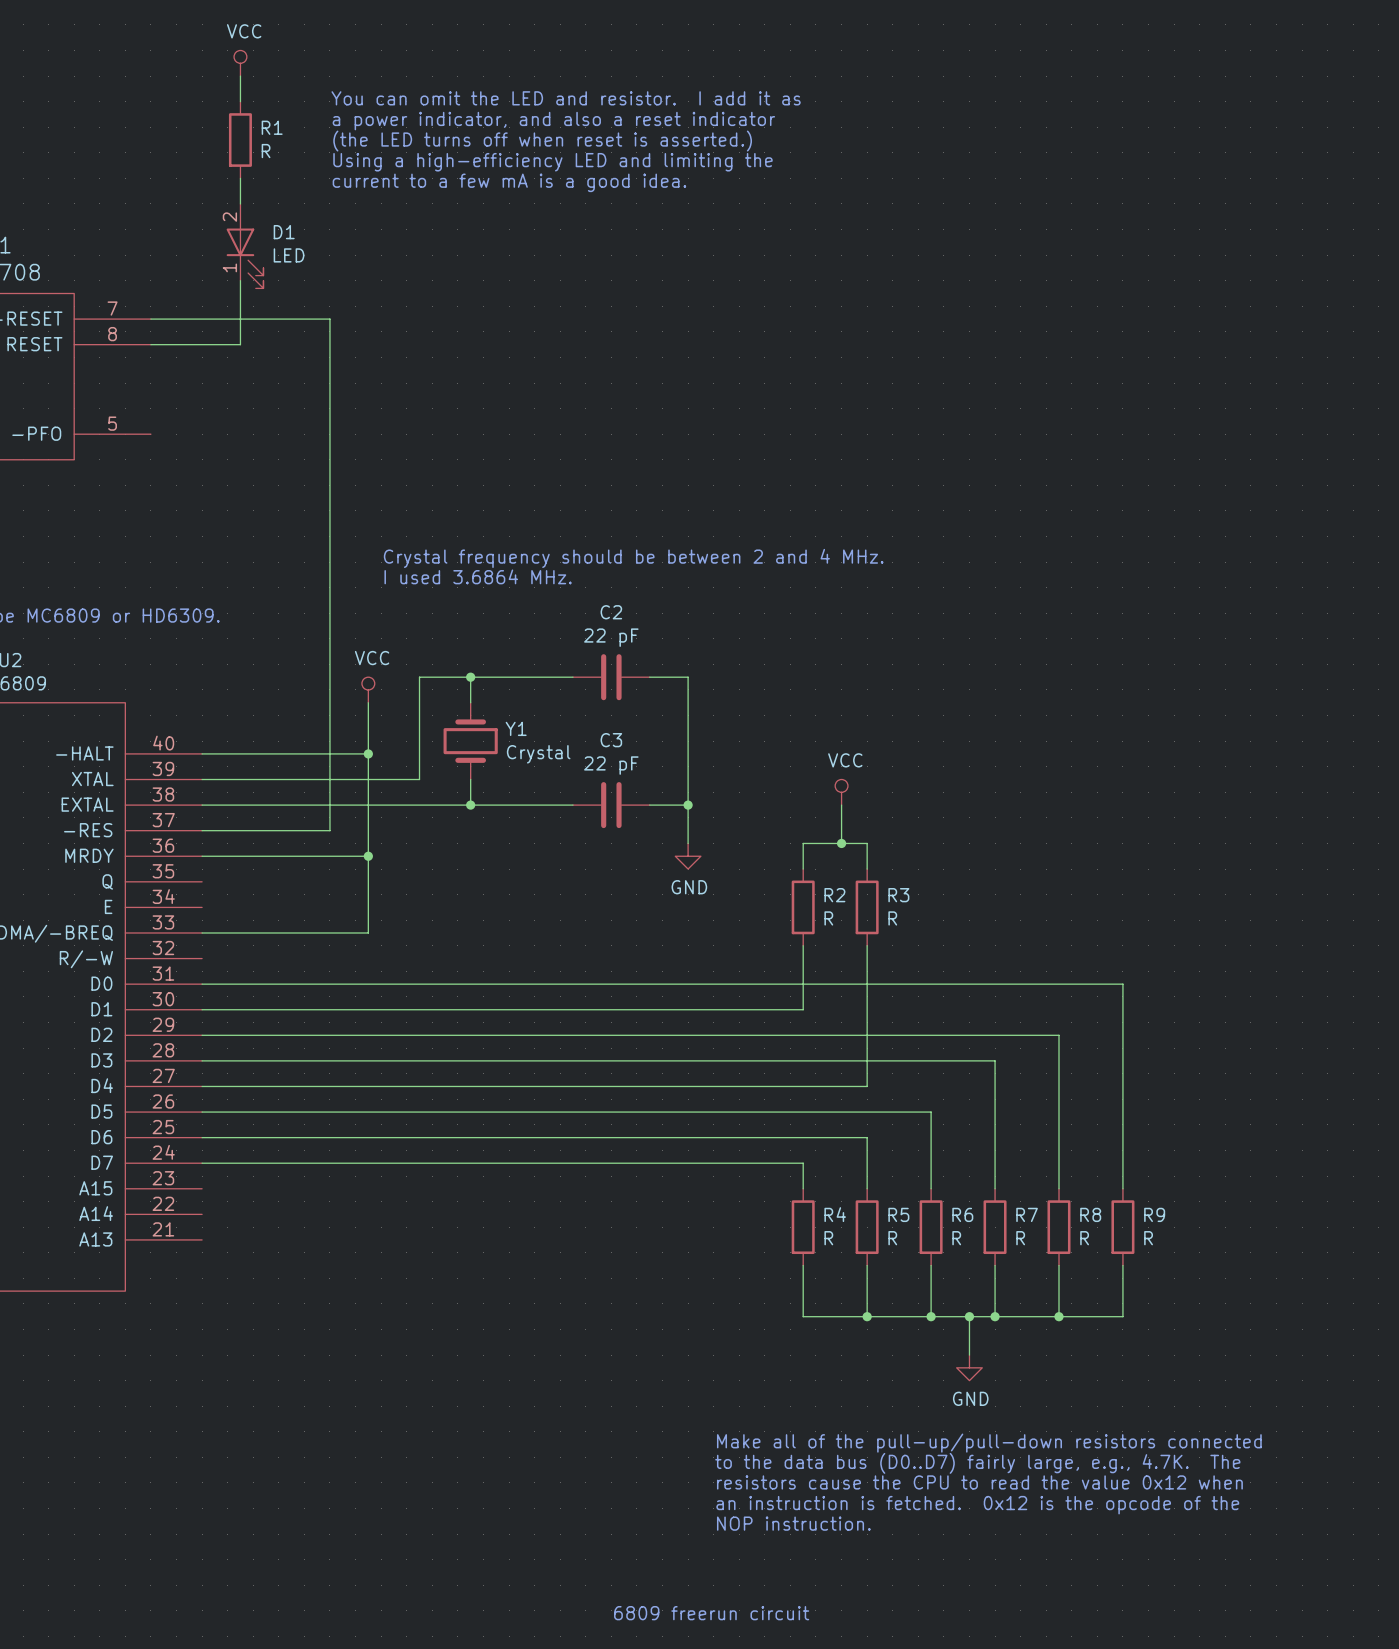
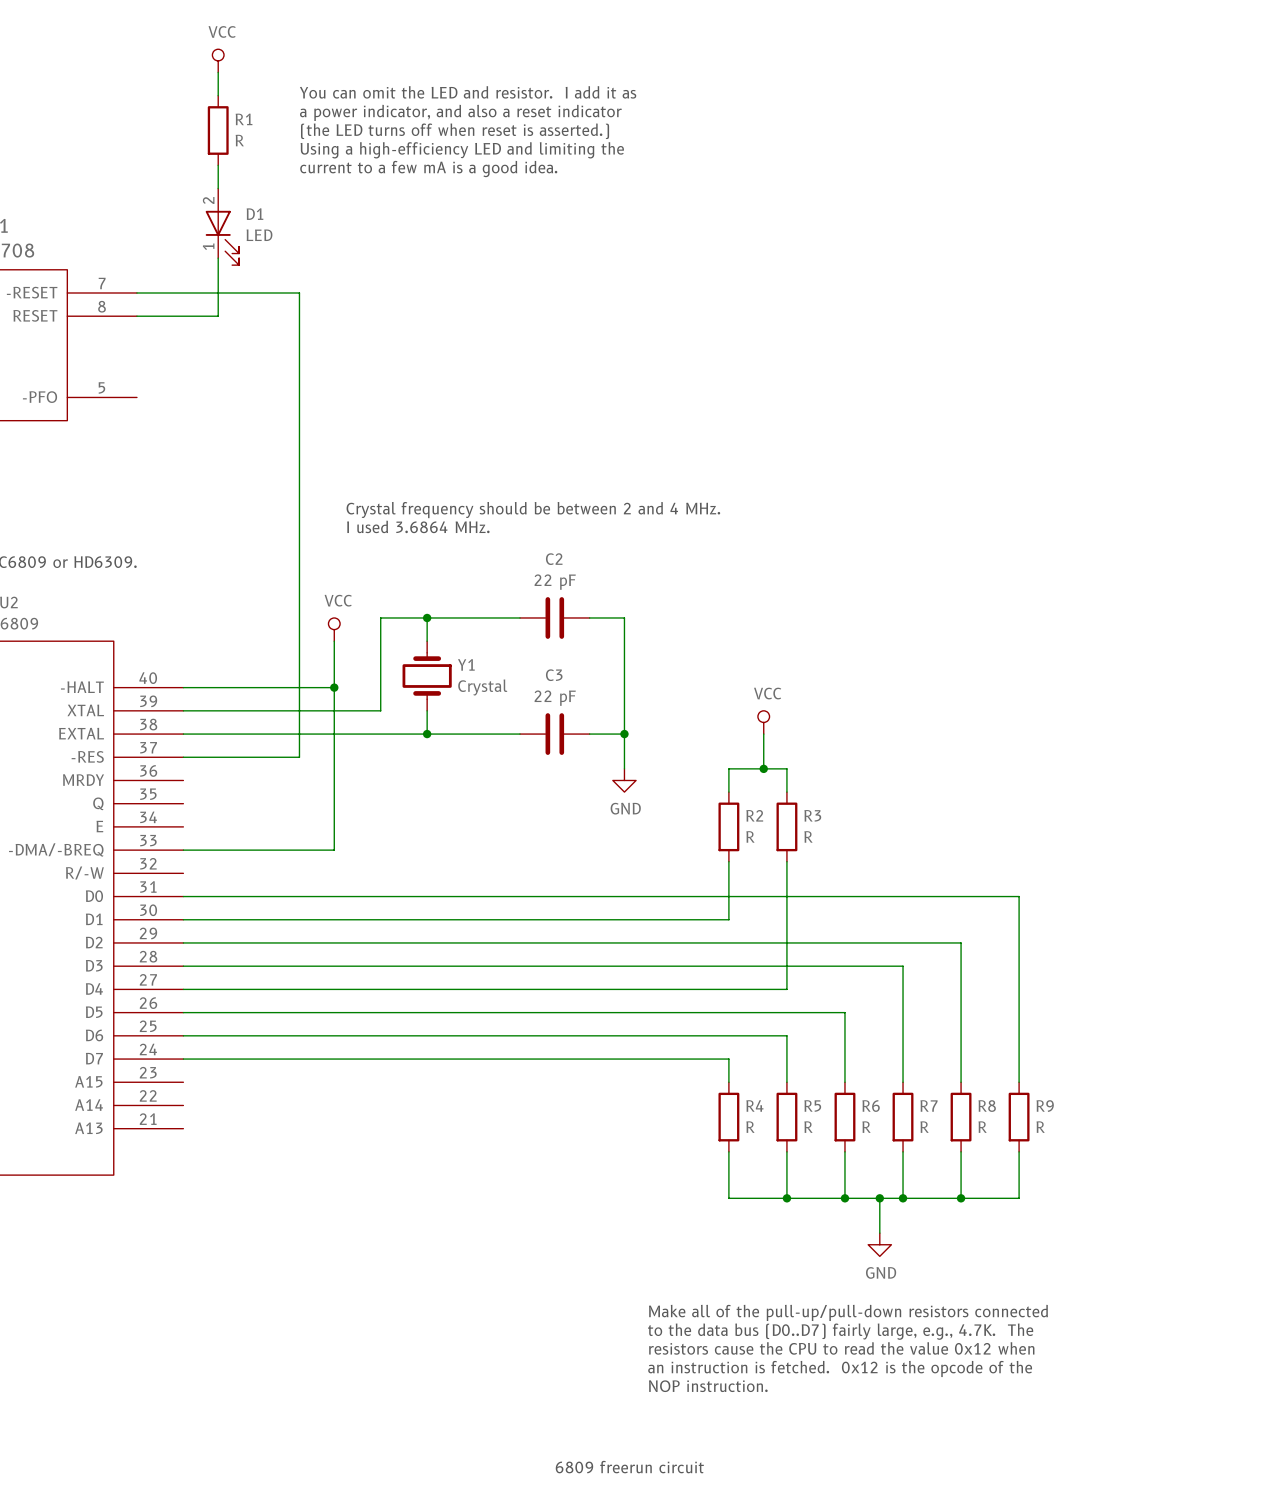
wire: (202, 856) (368, 856) -> none
junction: (368, 856) -> none

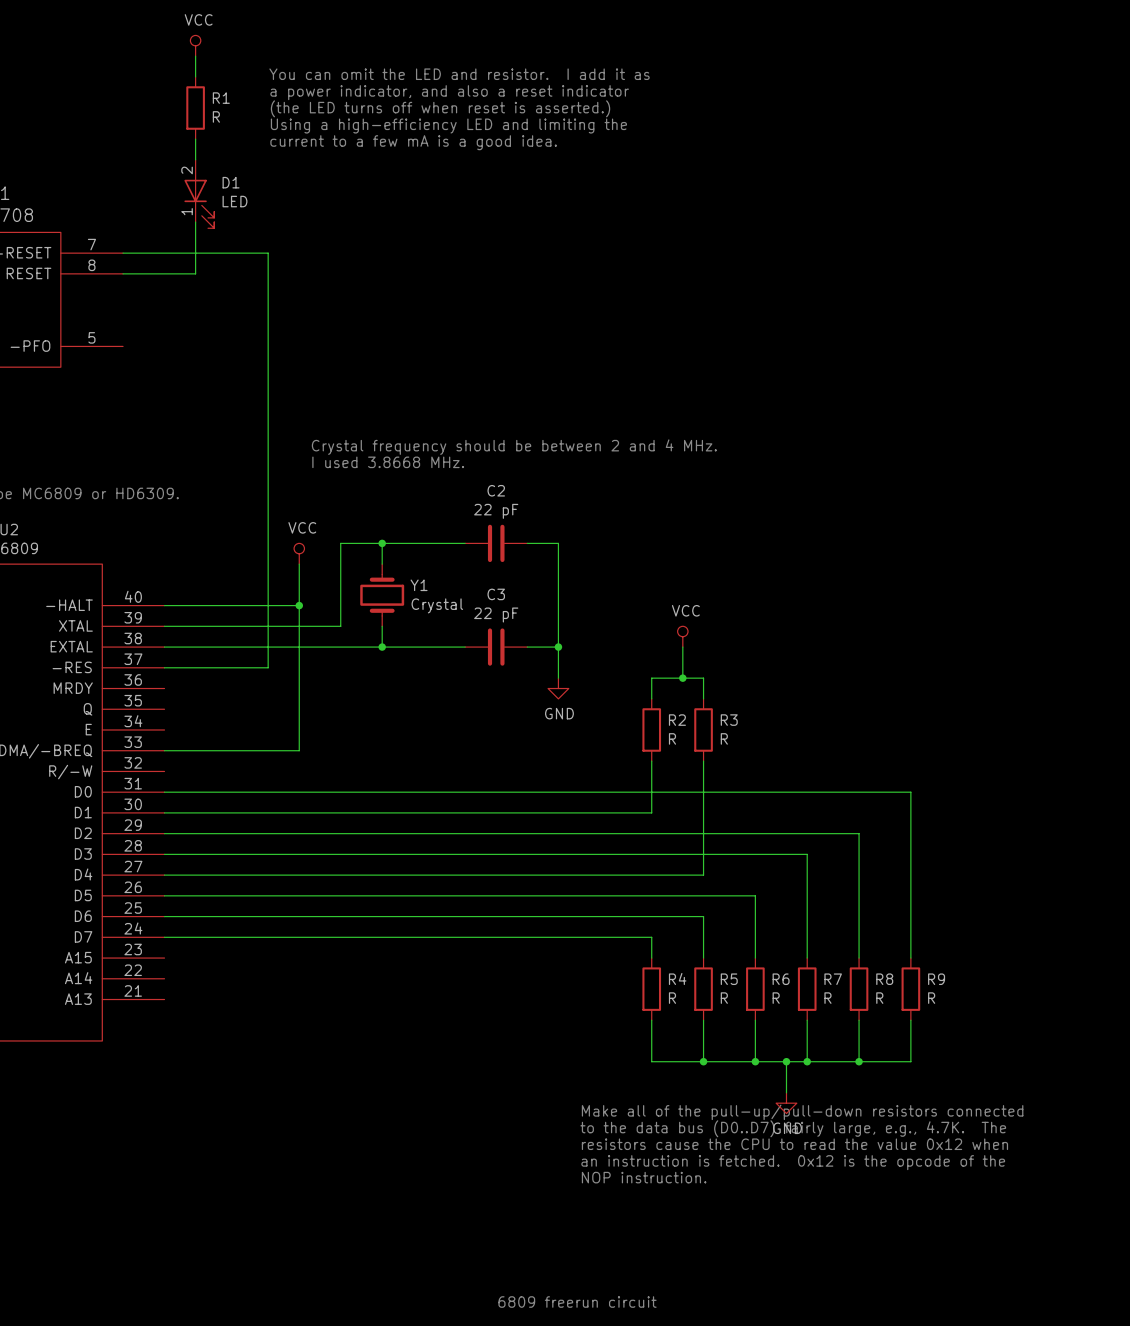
text: I used 3.6864 MHz. (418, 526) -> I used 3.8668 MHz. (388, 462)
text: none -> Make all of the pull-up/pull-down resistors connected (802, 1112)
text: none -> to the data bus (D0..D7) fairly large, e.g., 4.7K. The (793, 1128)
text: Make all of the pull-up/pull-down resistors connected (848, 1312) -> an instruction is fetched. 0x12 is the opcode of the (793, 1162)
text: to the data bus (D0..D7) fairly large, e.g., 4.7K. The (840, 1331) -> NOP instruction. (644, 1177)
text position: resistors cause the CPU to read the value 0x12 when (841, 1348) -> resistors cause the CPU to read the value 0x12 when (794, 1144)
text: an instruction is fetched. 0x12 is the opcode of the (840, 1368) -> none
text: NOP instruction. (708, 1386) -> none

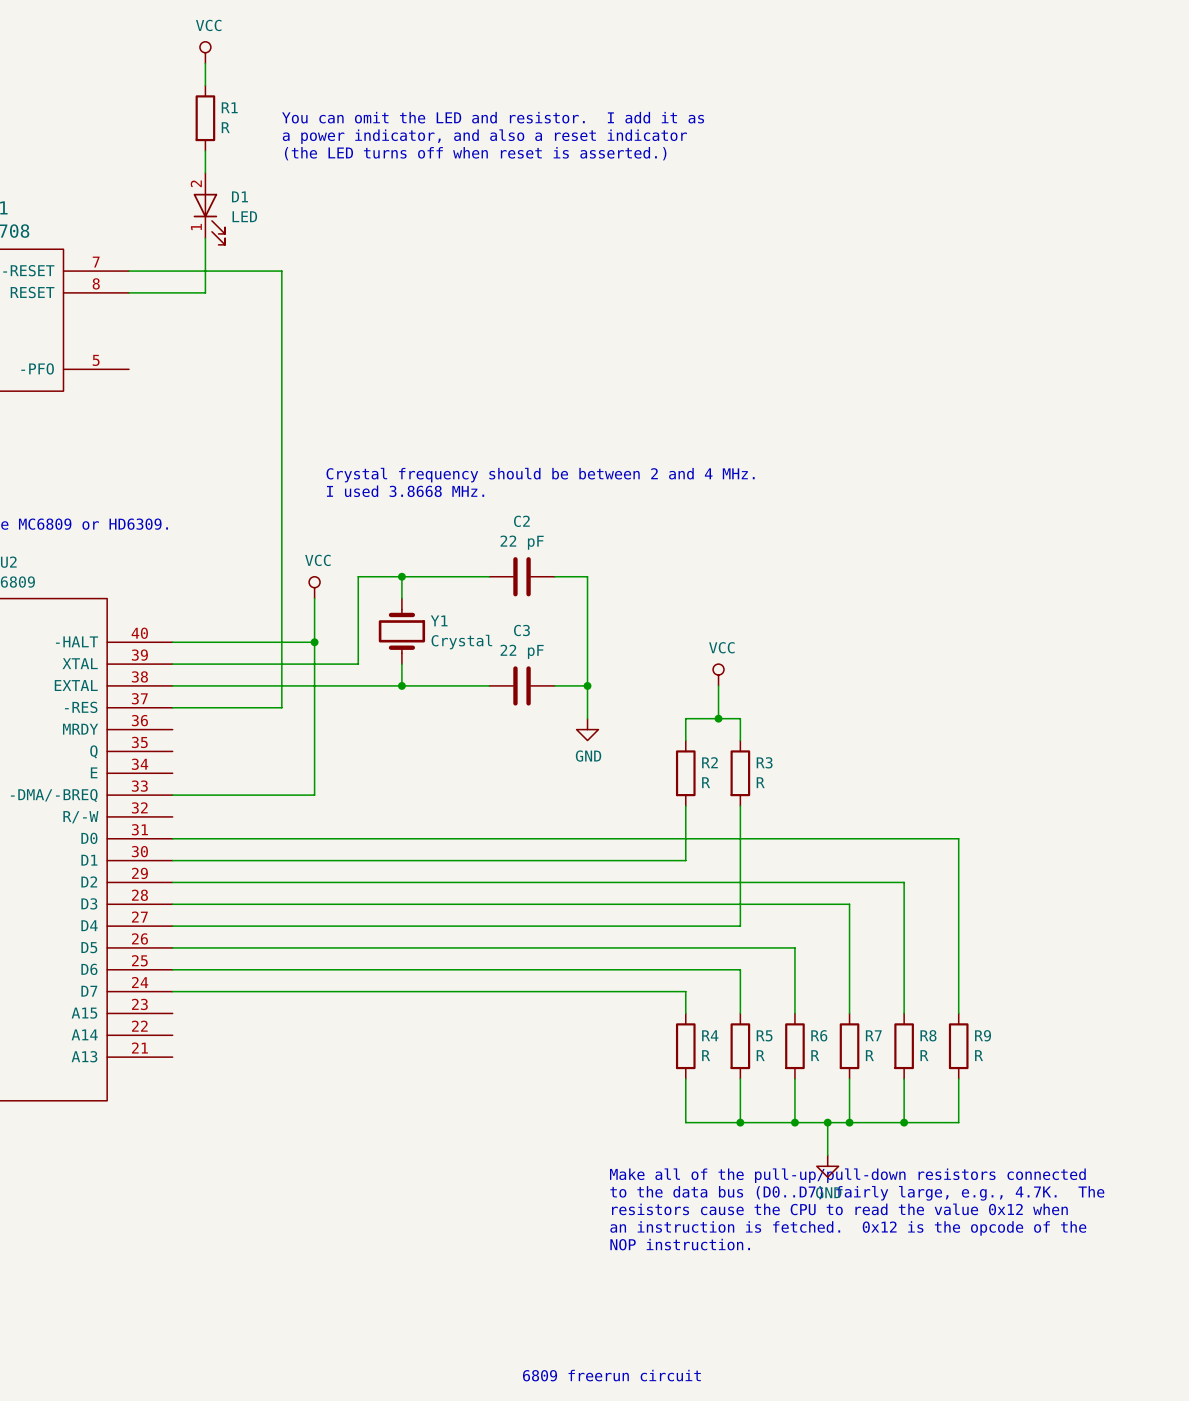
text: You can omit the LED and resistor. I add it as (459, 74) -> none
text: a power indicator, and also a reset indicator (449, 92) -> none
text: (the LED turns off when reset is asserted.) (440, 108) -> You can omit the LED and resistor. I add it as (493, 117)
text: Using a high-efficiency LED and limiting the (448, 126) -> a power indicator, and also a reset indicator (484, 136)
text: current to a few mA is a good idea. (413, 142) -> (the LED turns off when reset is asserted.) (475, 153)

